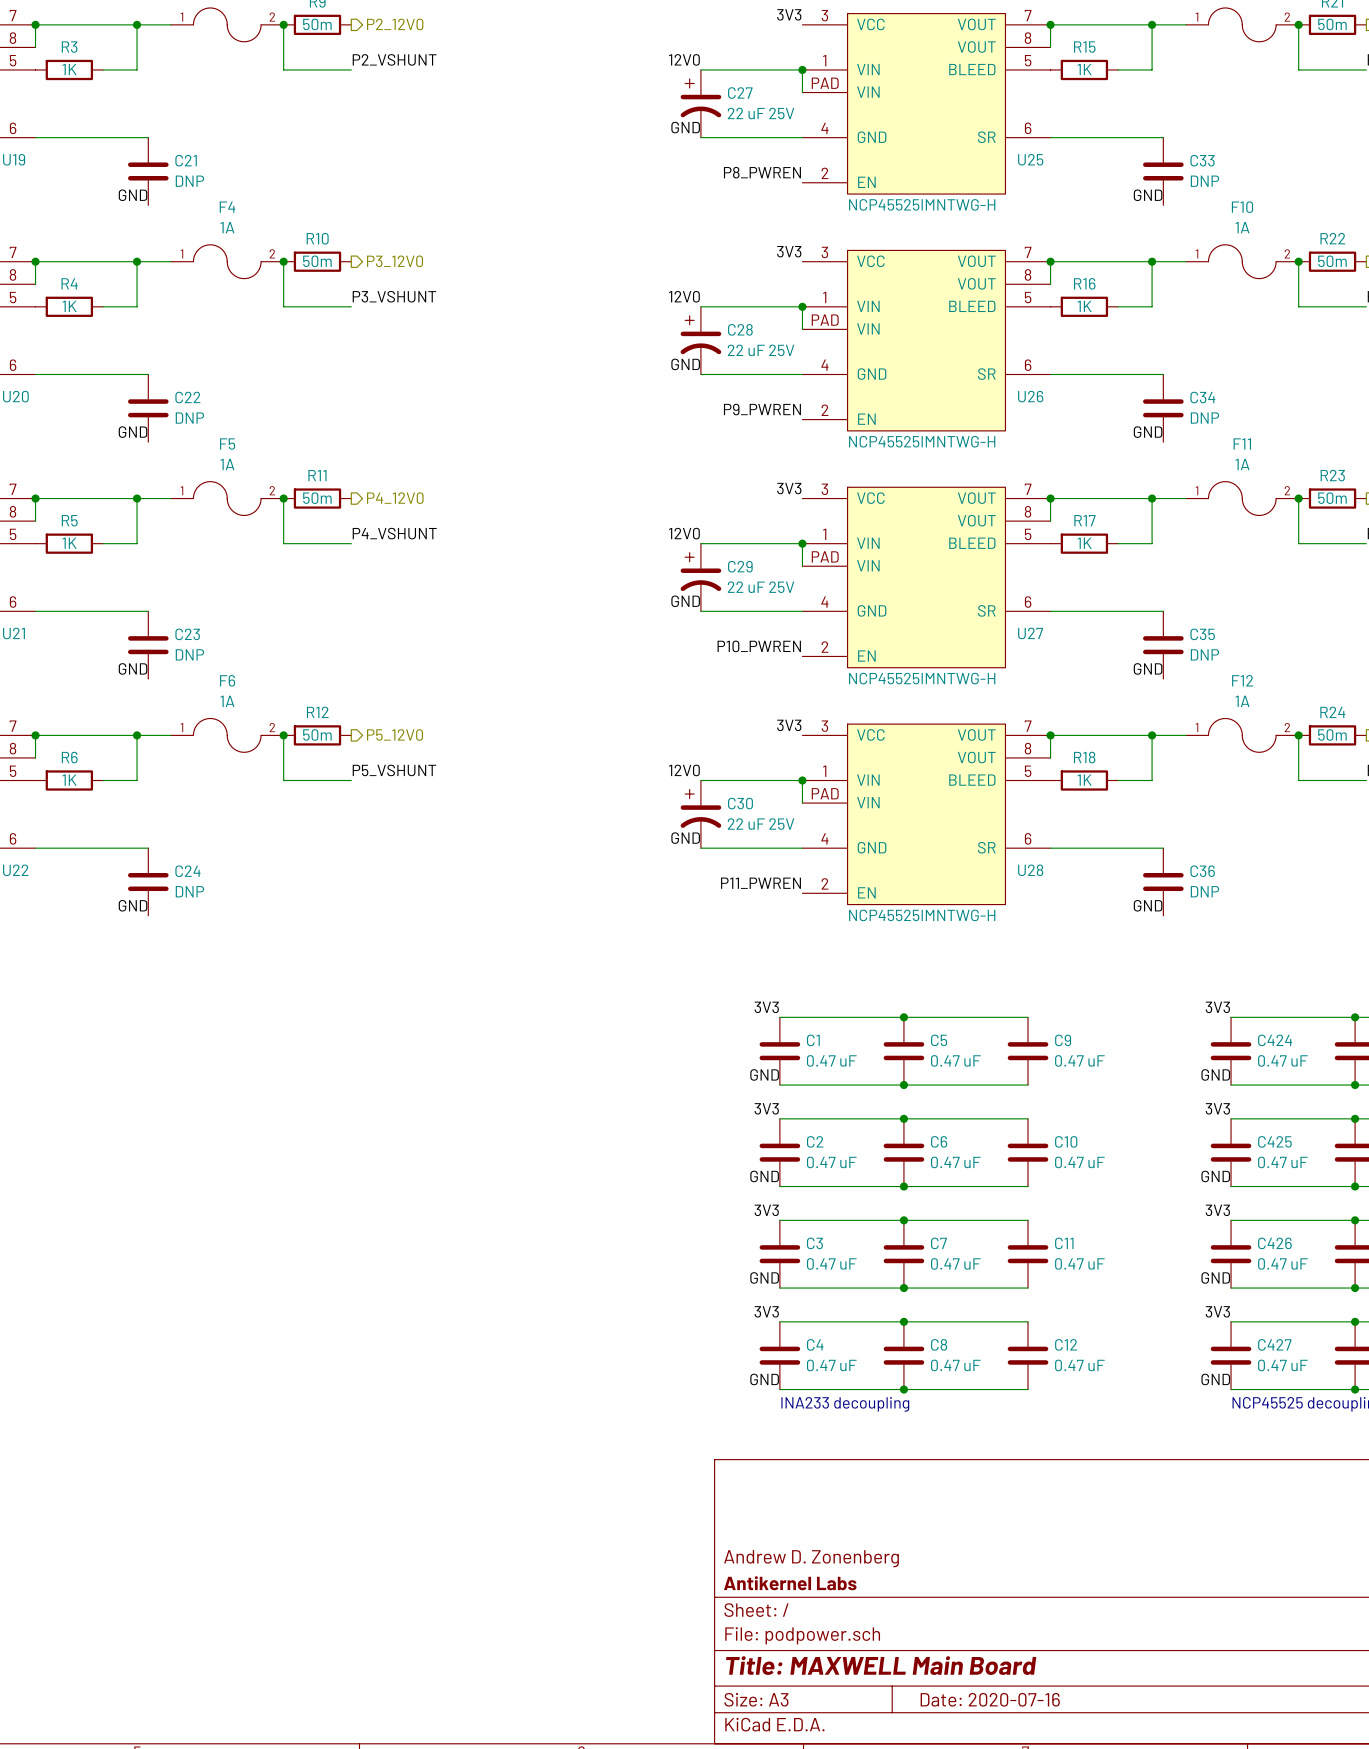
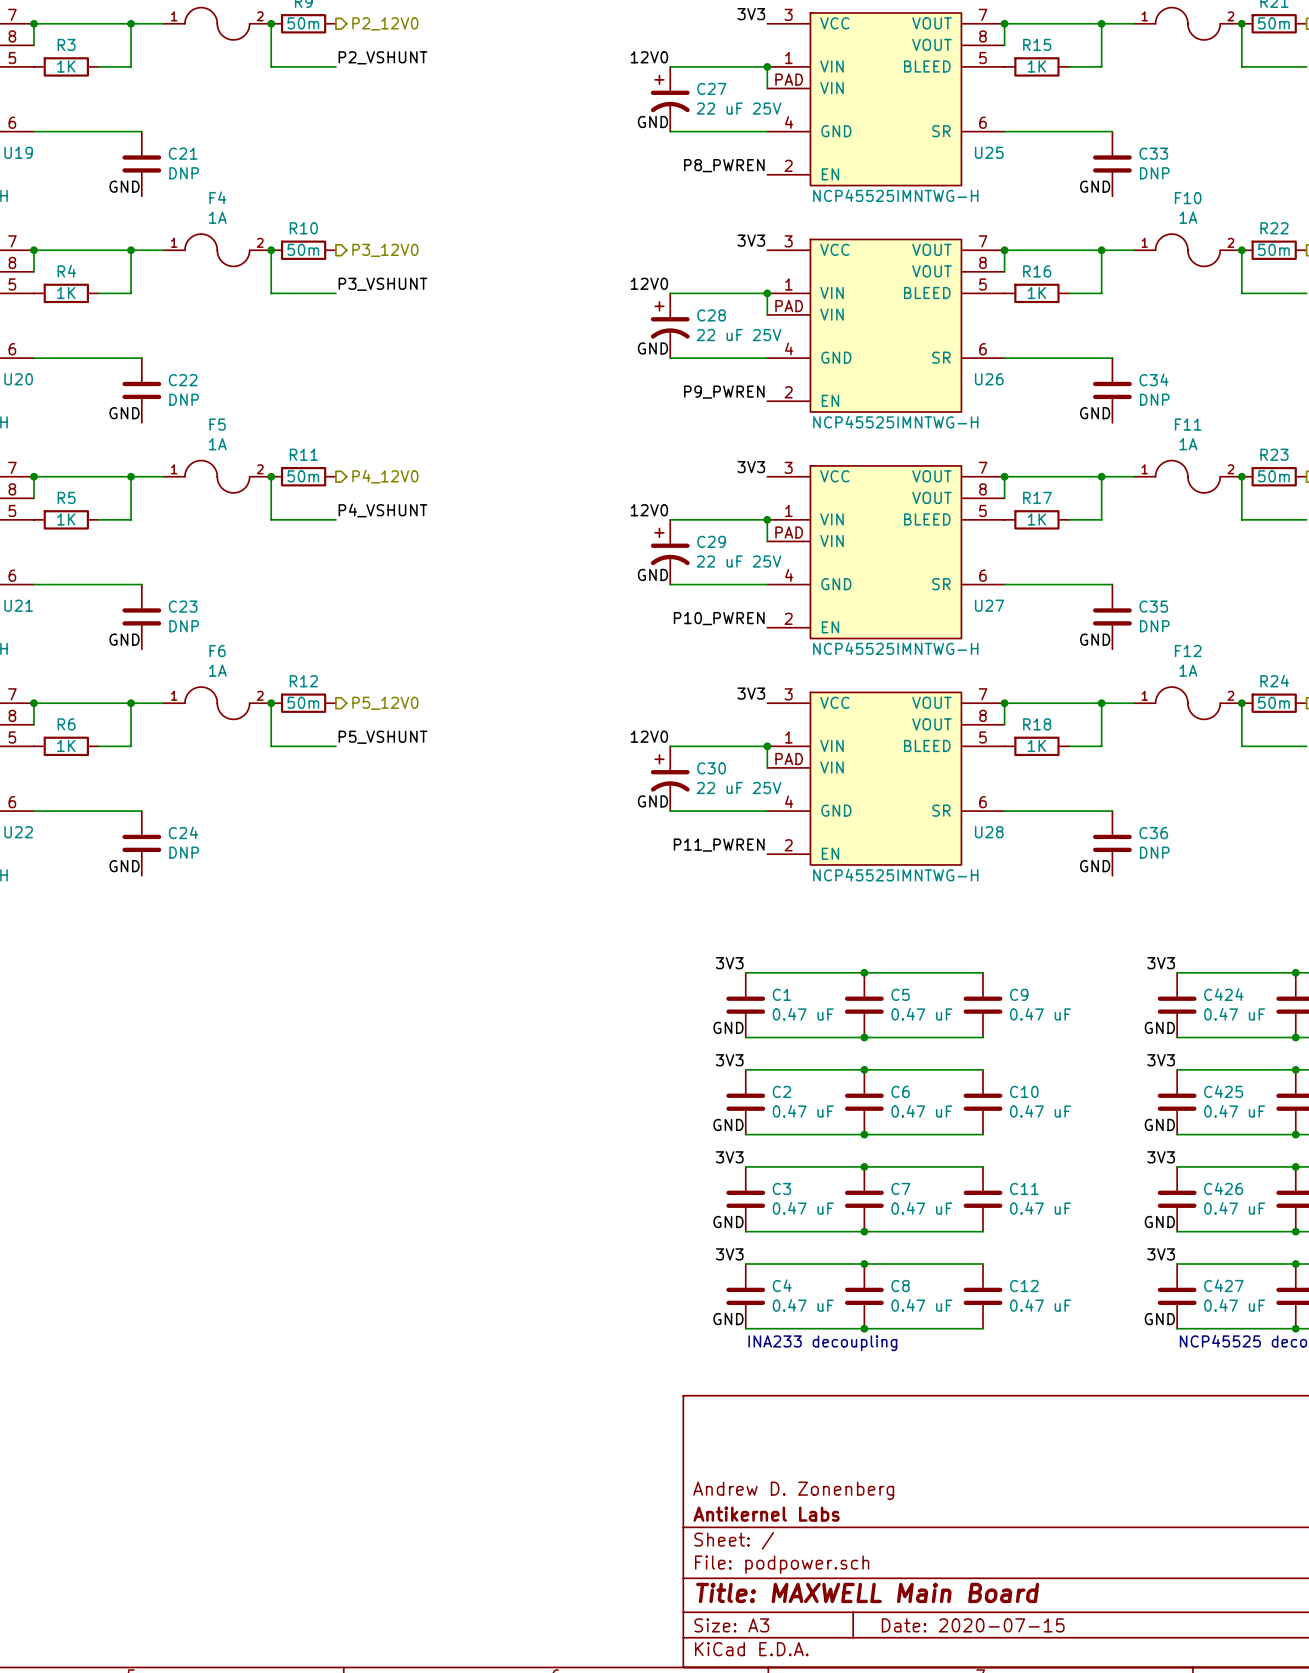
title block: Date: 2020-07-16 (990, 1699) -> Date: 2020-07-15 (973, 1625)

